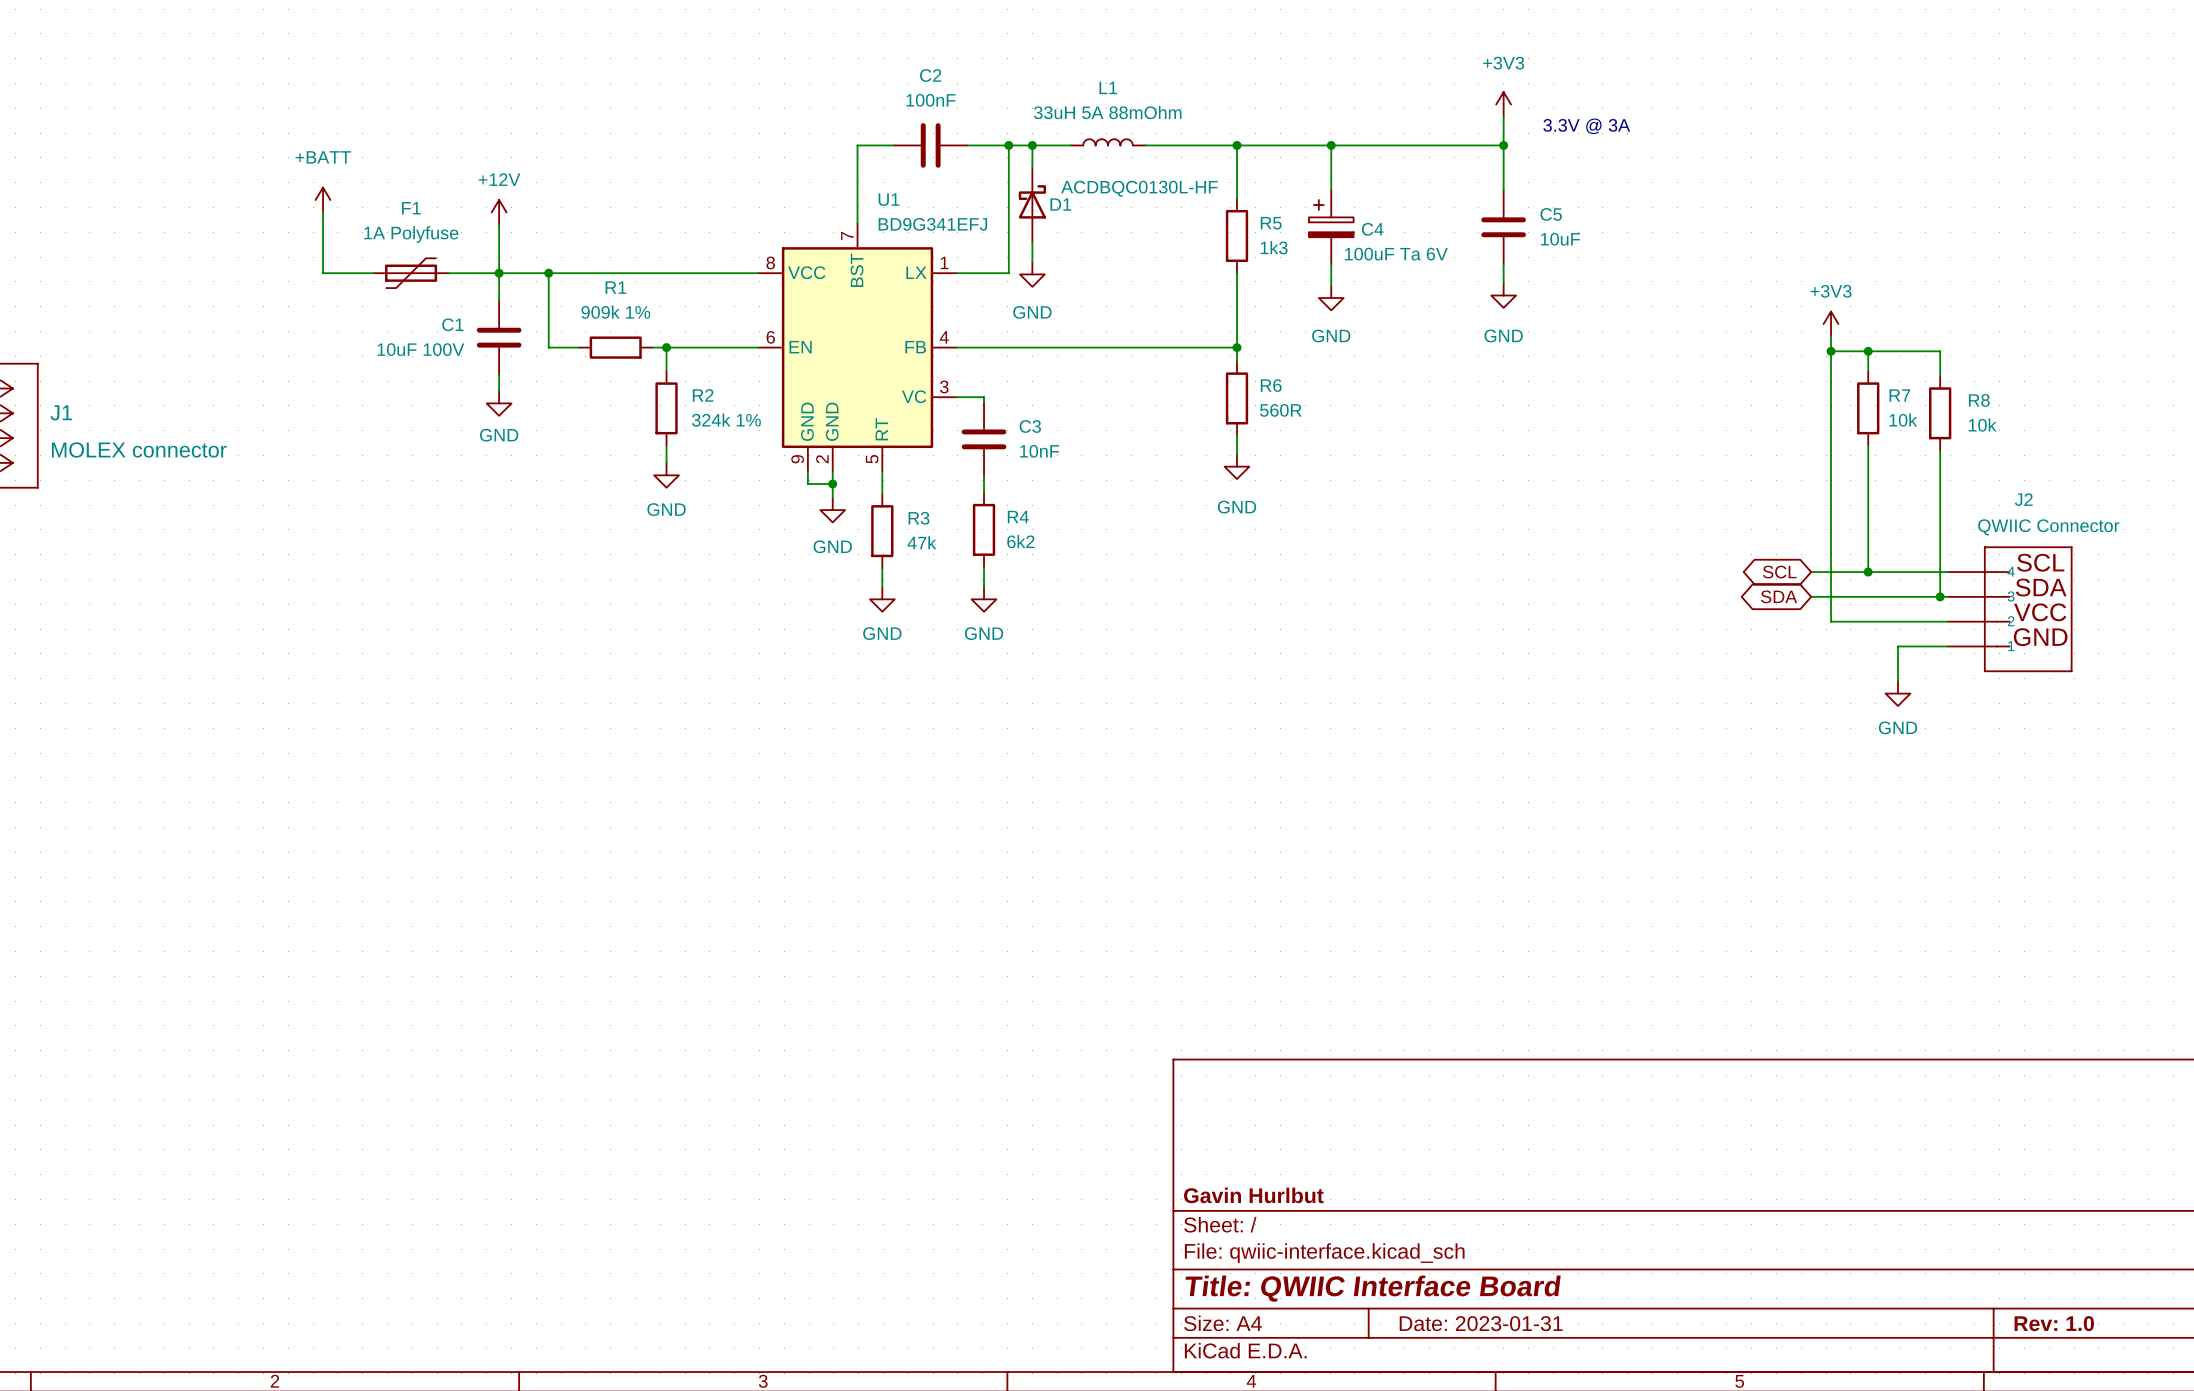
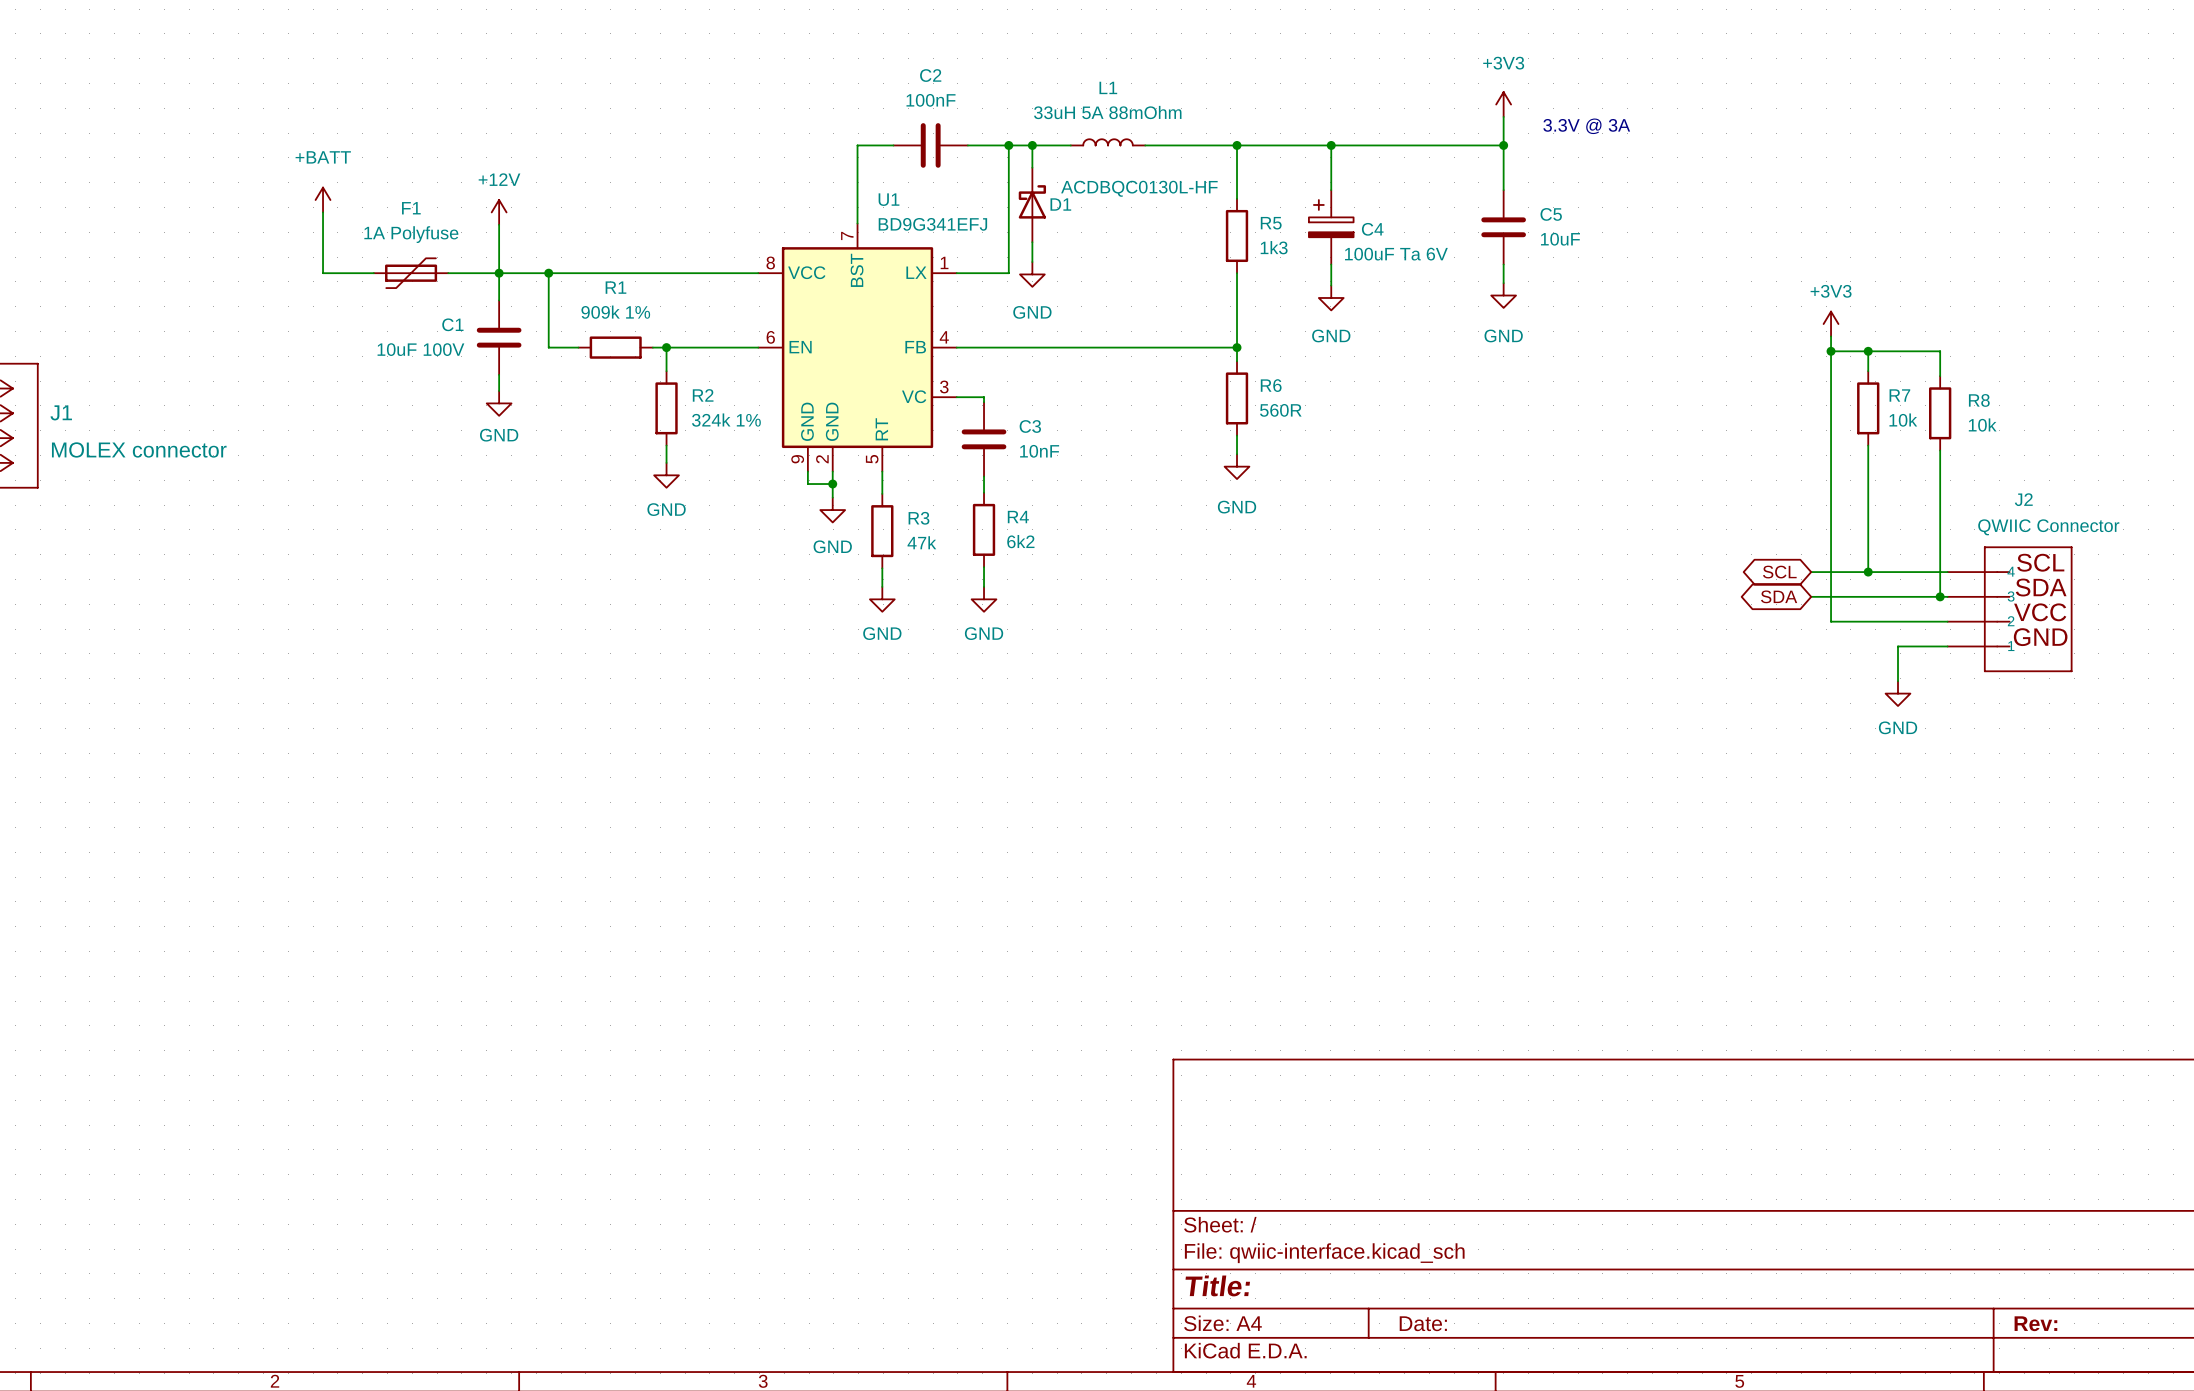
title block: Gavin Hurlbut (1253, 1195) -> none
title block: Title: QWIIC Interface Board (1373, 1288) -> Title: (1217, 1285)
title block: Date: 2023-01-31 (1481, 1323) -> Date: (1423, 1323)
title block: Rev: 1.0 (2054, 1323) -> Rev: (2035, 1323)

